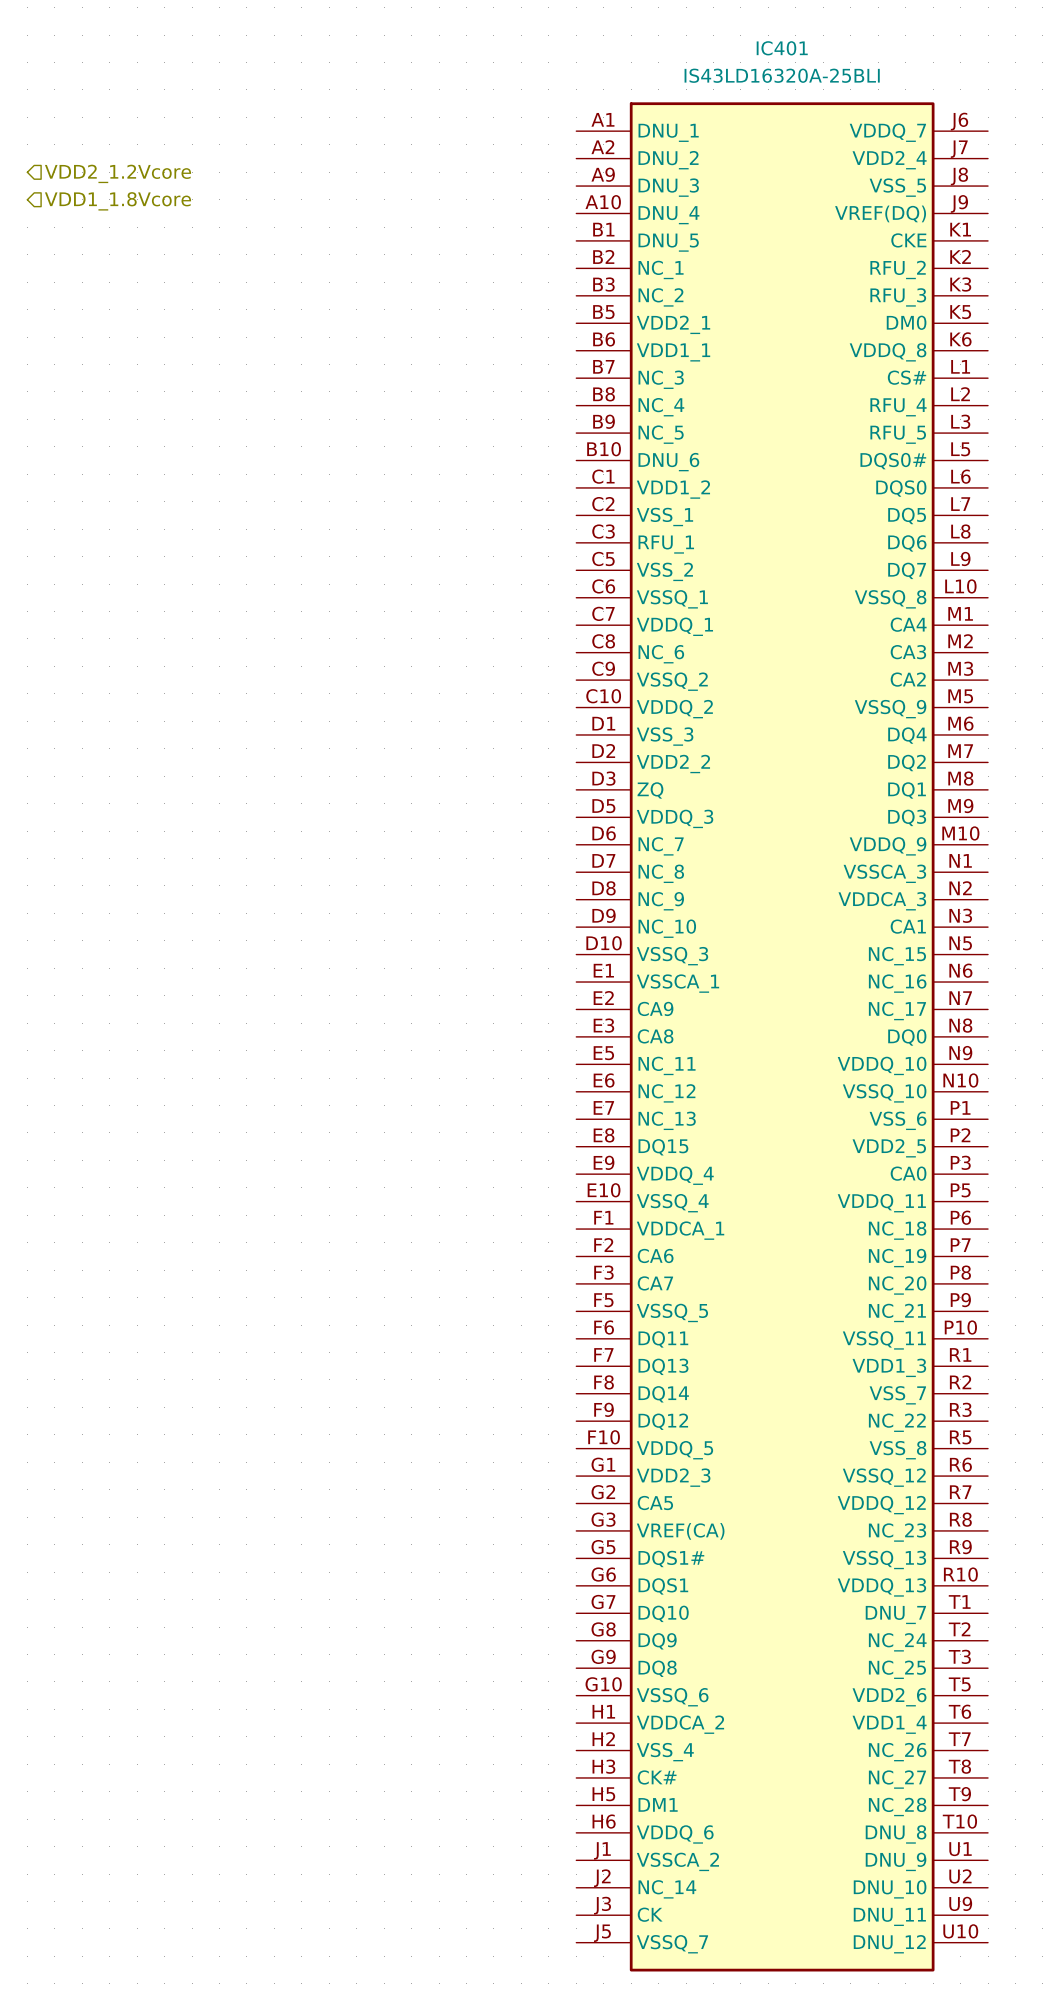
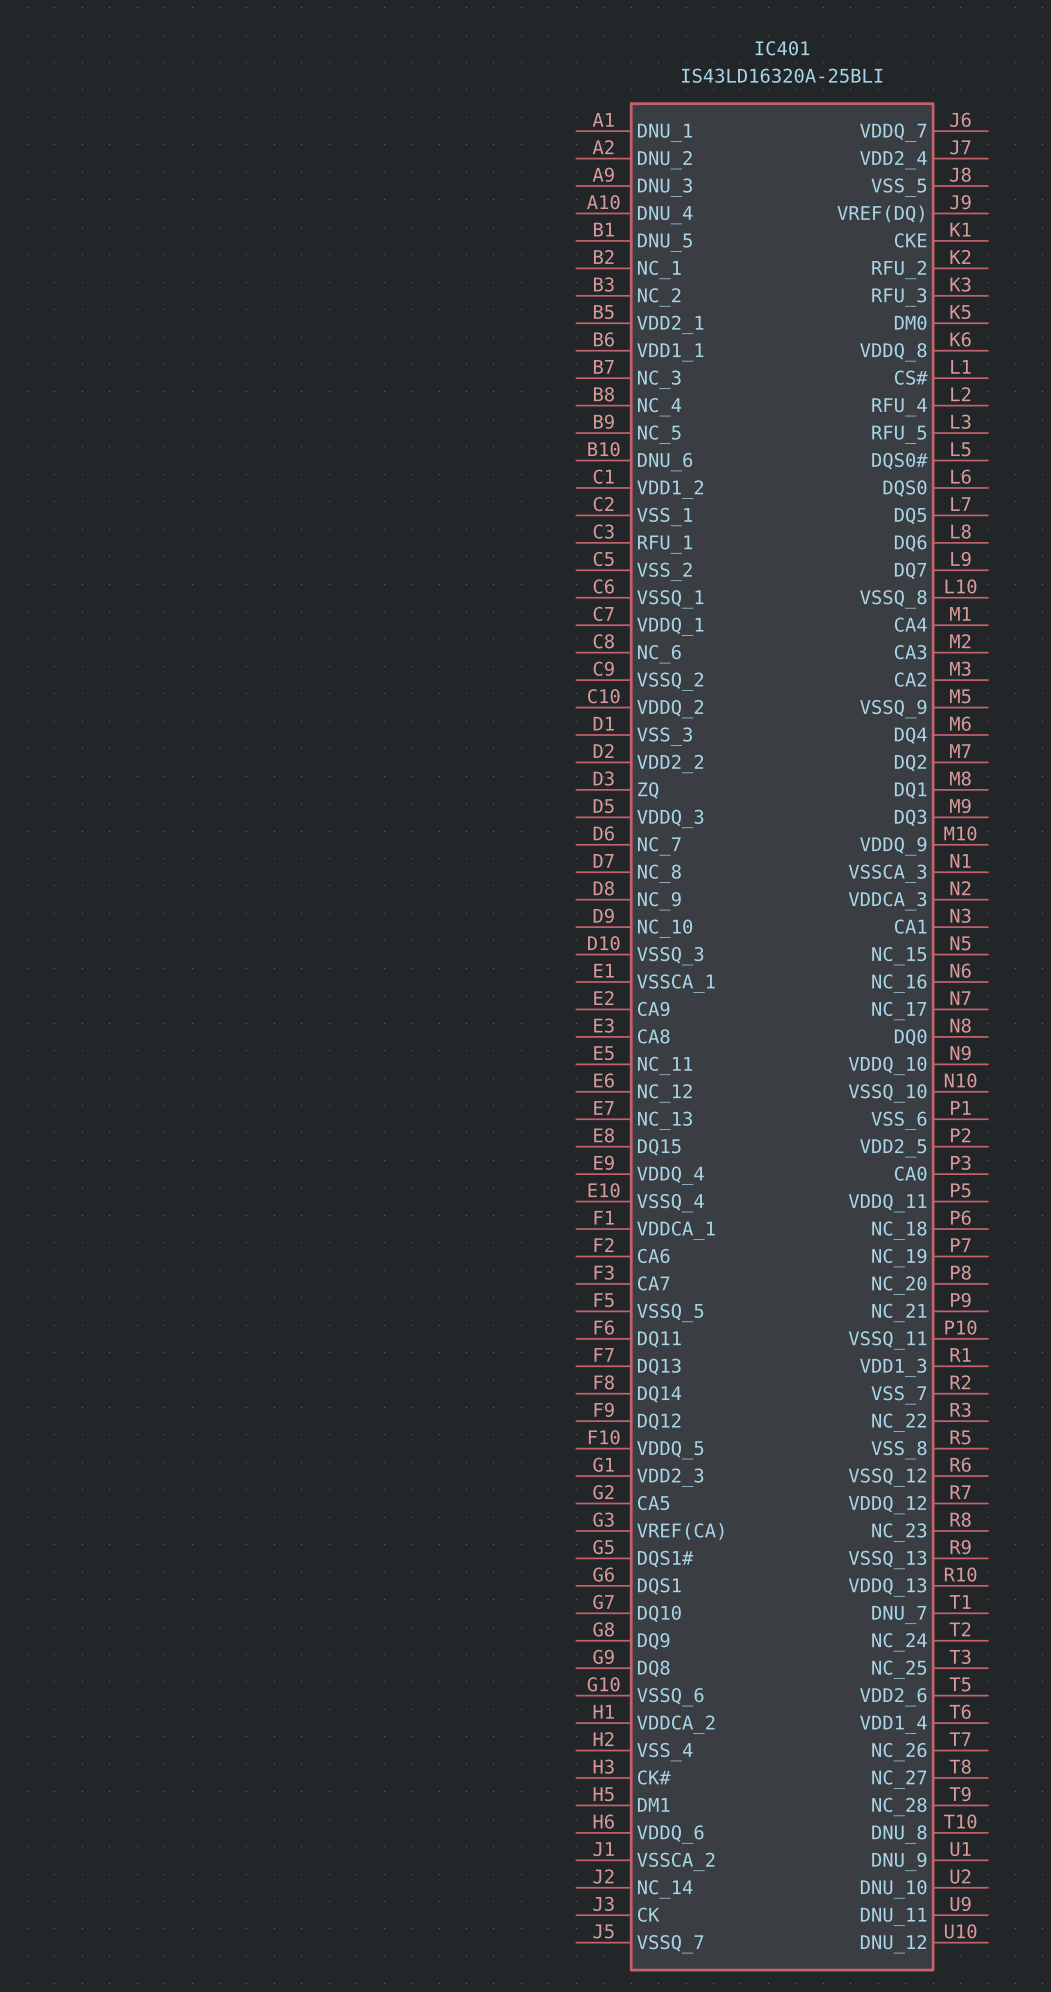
hierarchical label: VDD2_1.2Vcore (117, 173) -> none
hierarchical label: VDD1_1.8Vcore (117, 201) -> none

